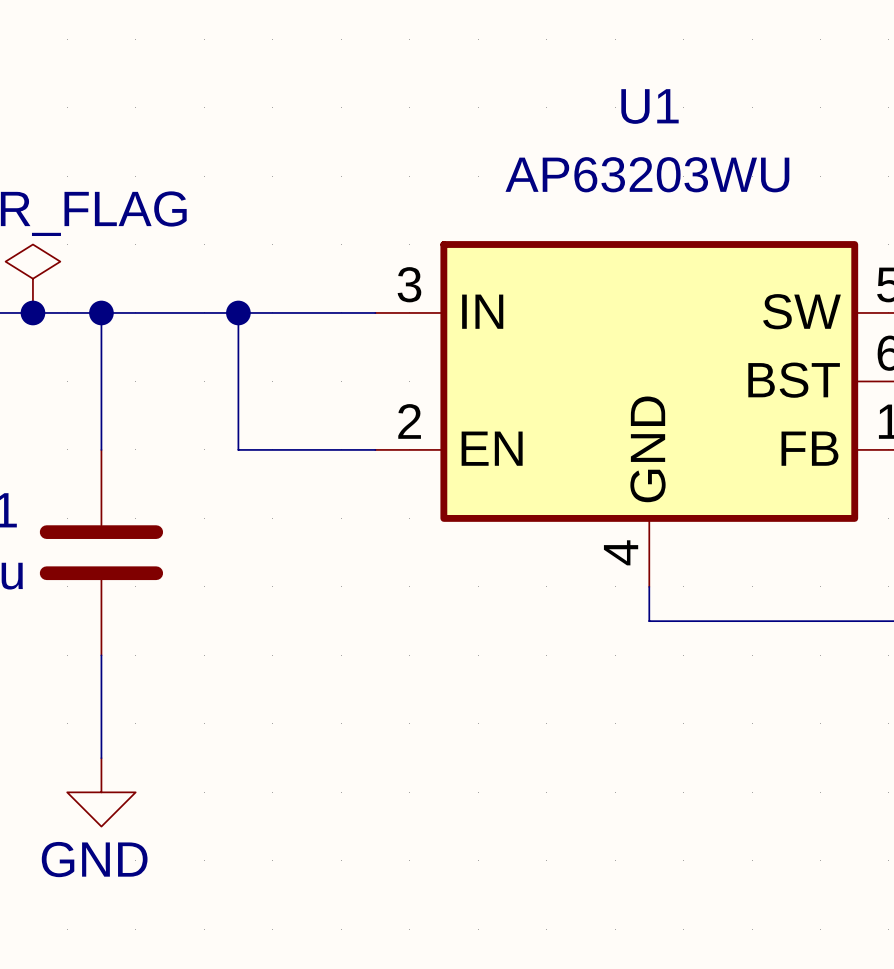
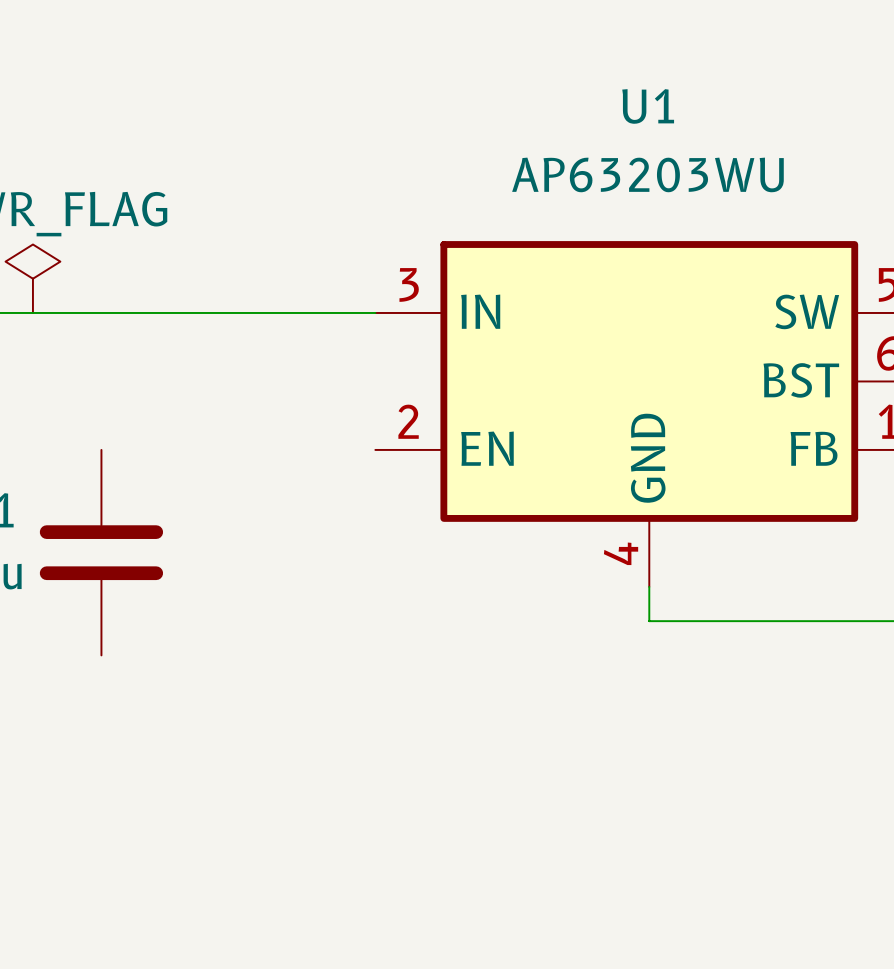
junction: (32, 312) -> none
wire: (101, 312) (101, 449) -> none
junction: (101, 312) -> none
wire: (238, 312) (238, 449) (375, 449) -> none
junction: (238, 312) -> none
wire: (101, 655) (101, 758) -> none
power symbol: GND (101, 792) -> none

